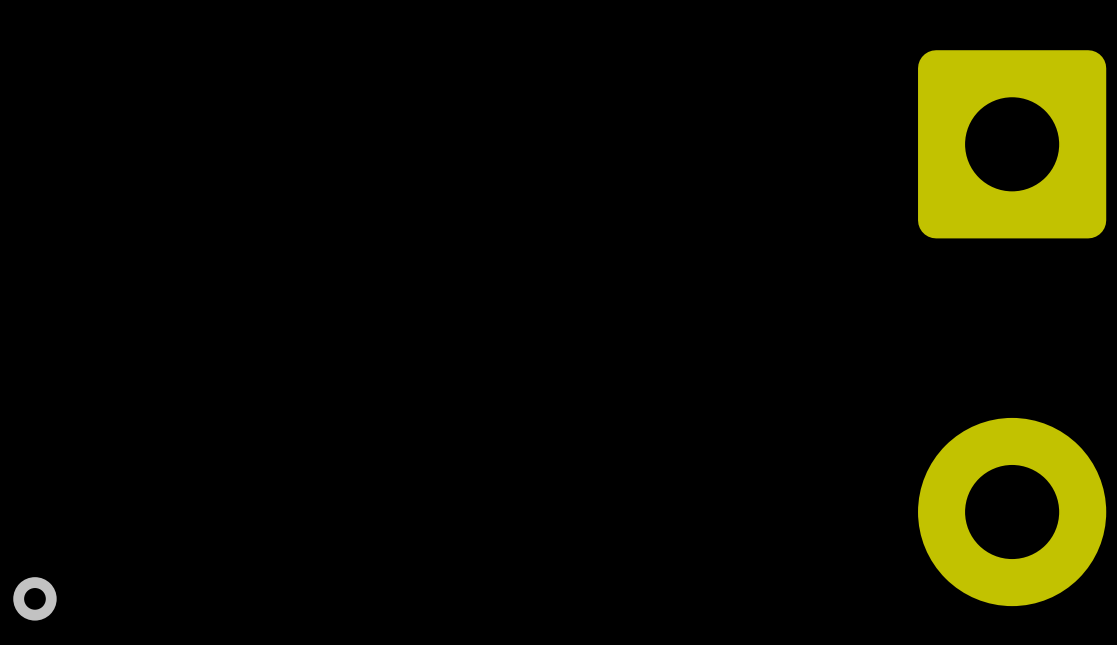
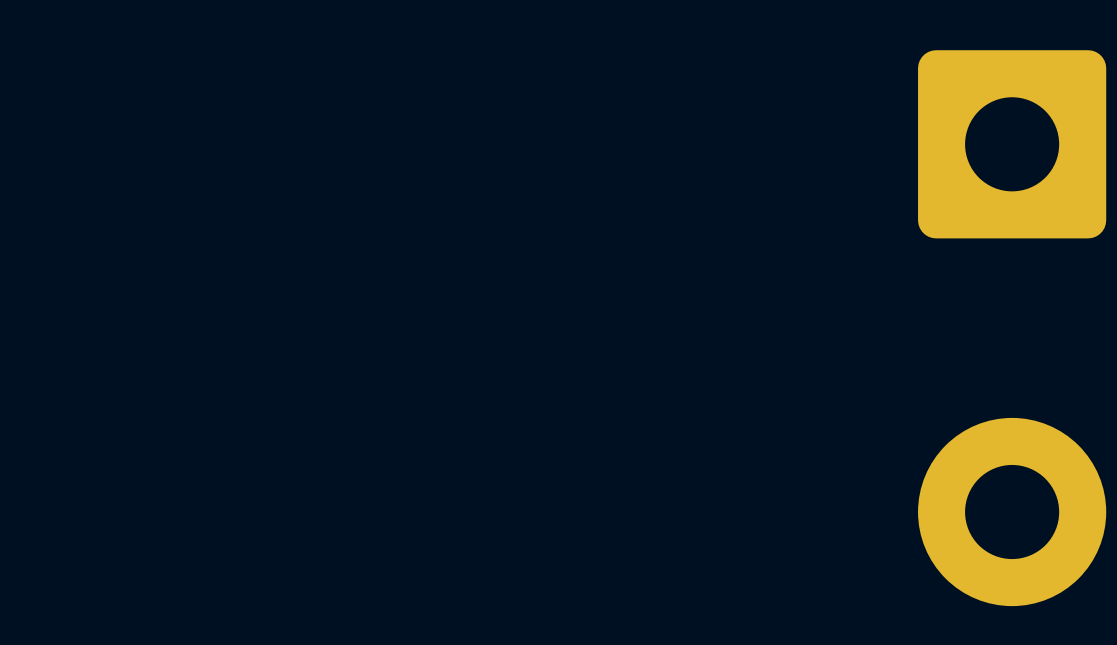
via: (34, 598) -> none

